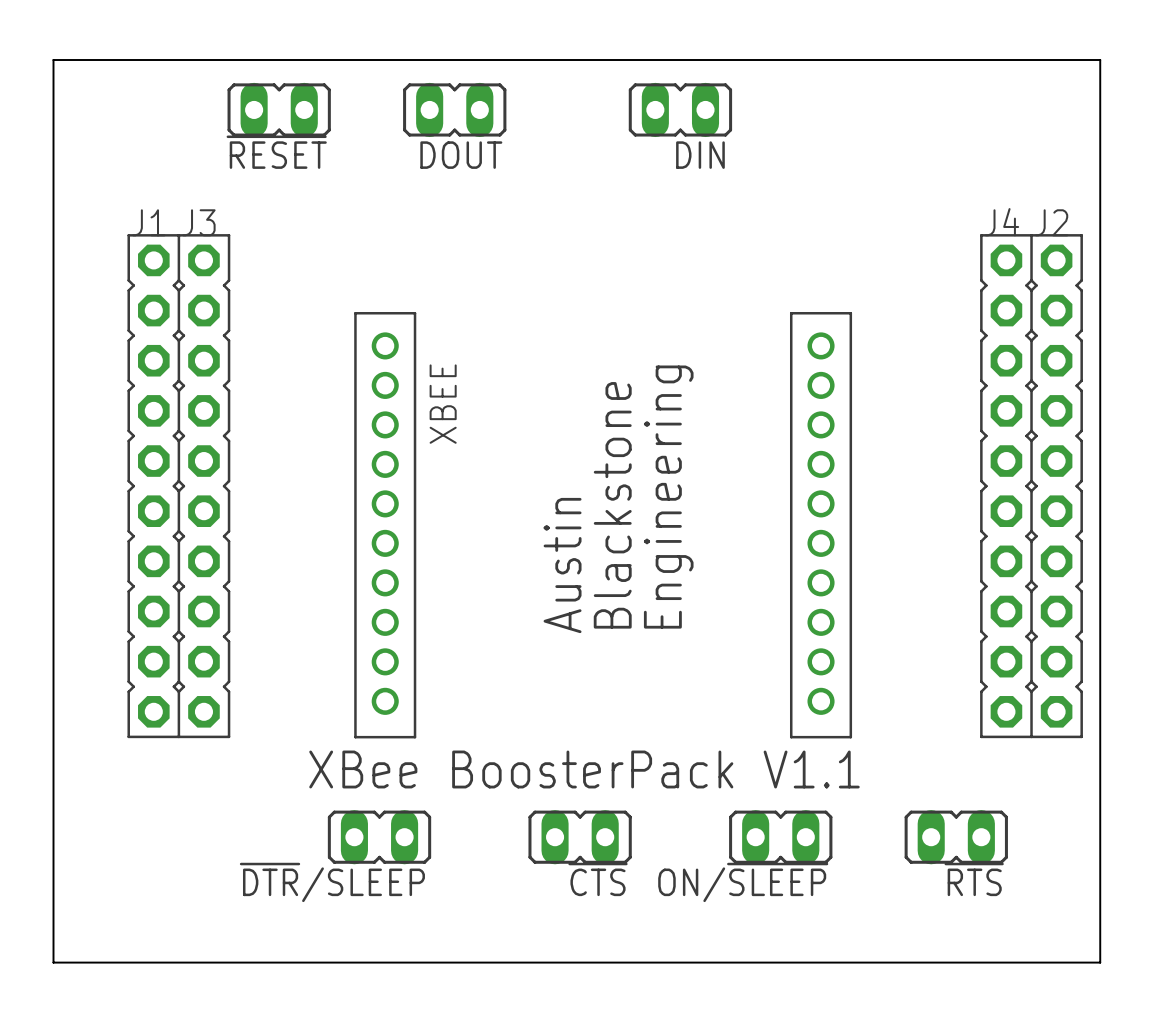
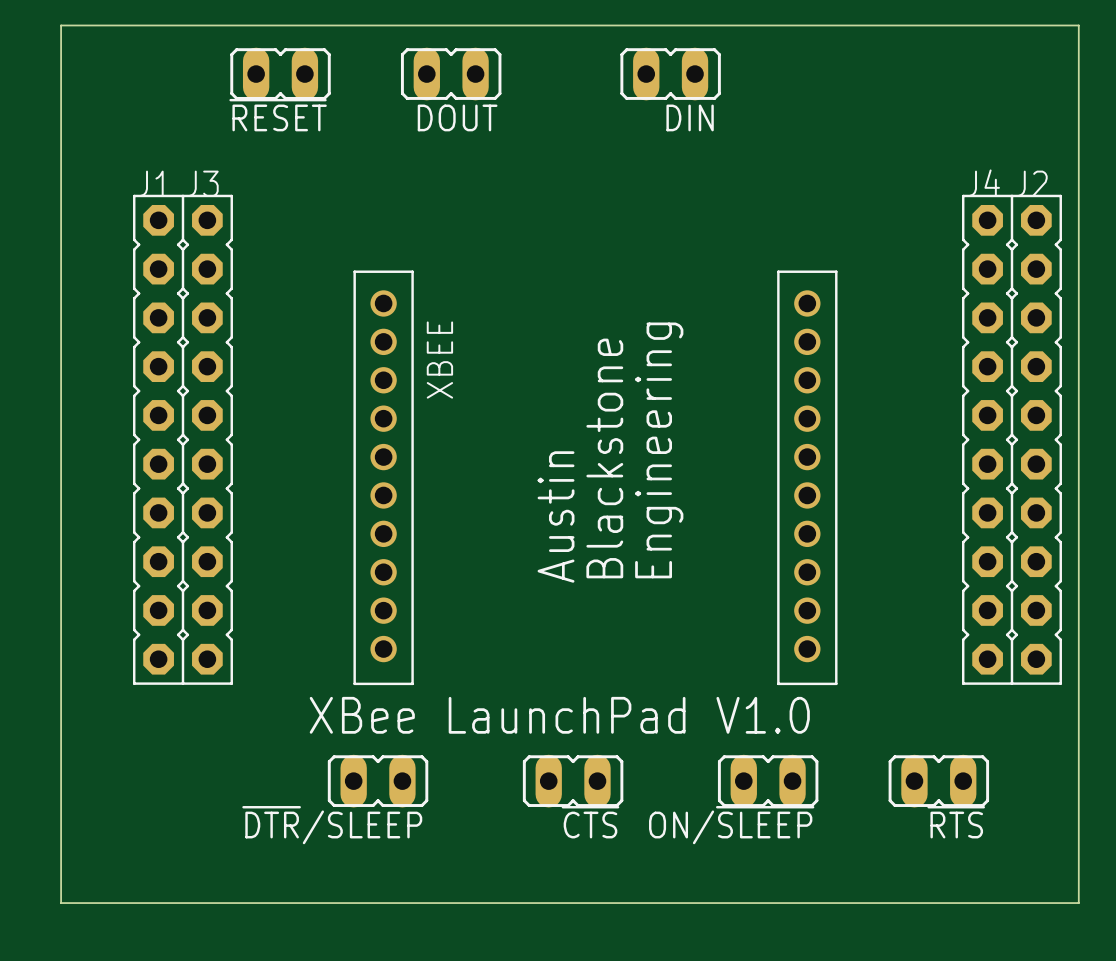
text: XBee BoosterPack V1.1 (584, 769) -> XBee LaunchPad V1.0 (559, 715)

